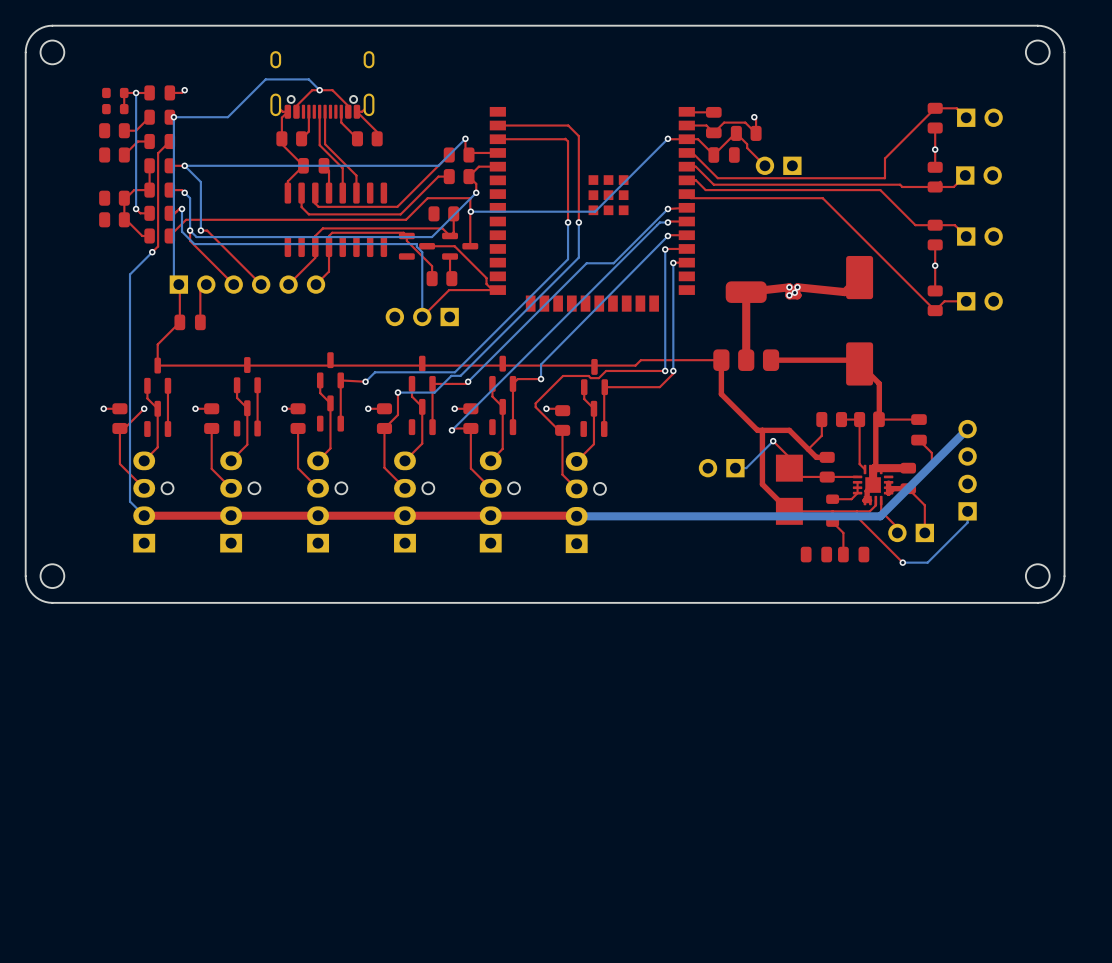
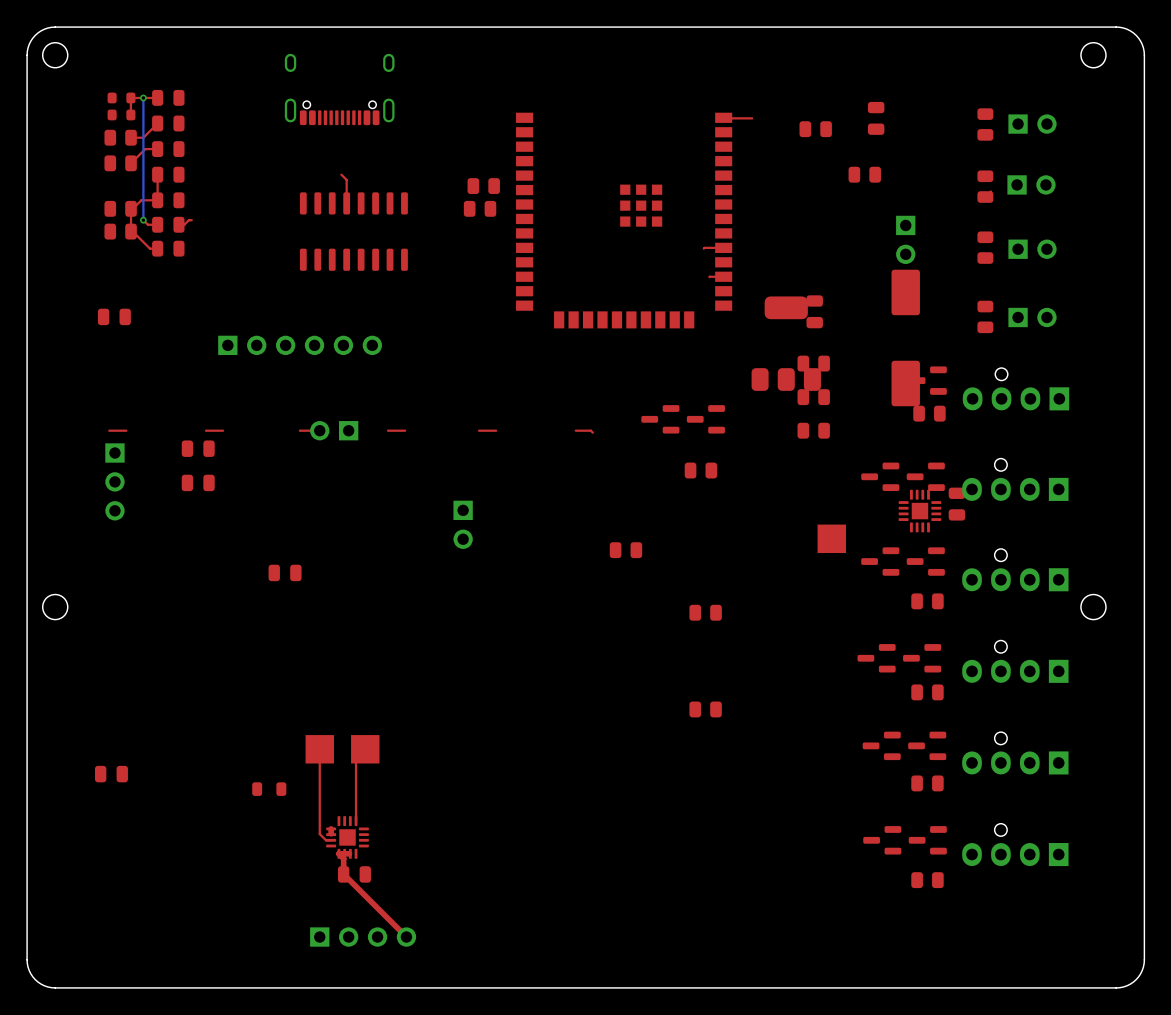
board edge: (1037, 25) (1048, 27) (1056, 33) (1062, 42) (1064, 52) (1064, 576) (1060, 589) (1051, 599) (1037, 602) (52, 602) (42, 600) (33, 595) (27, 586) (25, 576) -> (1093, 27) (1119, 27) (1130, 30) (1140, 41) (1144, 55) (1144, 959) (1140, 973) (1130, 984) (1116, 987) (55, 987) (44, 985) (32, 976) (27, 959) (27, 607)
top track: (184, 90) (182, 92) (169, 92) -> none
via: (184, 90) -> none
bottom track: (319, 90) (308, 79) (265, 79) (227, 117) (173, 117) (173, 279) (178, 284) -> none
via: (319, 90) -> none
top track: (275, 104) (282, 111) (287, 111) (281, 117) (281, 144) (303, 165) (287, 181) (287, 193) -> none
top track: (369, 104) (362, 111) (356, 111) (377, 132) (377, 138) -> none
top track: (938, 105) (884, 158) (884, 178) (717, 178) (692, 152) (686, 152) -> none
top track: (935, 108) (956, 108) (966, 117) -> none
top track: (308, 111) (308, 131) (301, 138) -> none
top track: (319, 111) (319, 145) (342, 168) (342, 193) -> none
top track: (325, 111) (325, 144) (356, 175) (356, 193) -> none
top track: (341, 111) (341, 122) (357, 138) -> none
top track: (348, 111) (348, 106) (332, 90) (312, 90) (296, 106) (296, 111) -> none
part: none -> (876, 118)
via: (173, 117) -> none
top track: (754, 117) (756, 118) (756, 133) (745, 122) (724, 122) (713, 132) (706, 125) (686, 125) -> none
via: (754, 117) -> none
part: (713, 122) -> none
top track: (497, 125) (568, 125) (578, 136) (578, 222) -> none
top track: (935, 128) (935, 167) (939, 163) -> none
part position: (746, 133) -> (815, 129)
part: (291, 138) -> none
part: (367, 138) -> none
top track: (465, 138) (465, 151) (468, 155) (471, 152) (497, 152) -> none
bottom track: (465, 138) (438, 165) (184, 165) (200, 182) (200, 230) -> none
via: (465, 138) -> none
top track: (667, 138) (698, 139) (713, 155) (736, 133) (747, 144) (747, 148) (764, 165) -> none
bottom track: (667, 138) (595, 211) (470, 211) -> none
via: (667, 138) -> none
top track: (497, 139) (565, 138) (568, 141) (568, 222) -> none
top track: (169, 141) (158, 153) (158, 246) (152, 252) -> none
via: (935, 149) -> none
top track: (449, 155) (397, 206) (318, 206) (315, 203) (315, 193) -> none
part: (459, 155) -> none
part: (724, 155) -> none
top track: (184, 165) (169, 165) -> none
via: (184, 165) -> none
part: (313, 165) -> none
part rotation: 0° (778, 165) -> 90° counterclockwise (905, 239)
part position: (778, 165) -> (905, 239)
part: none -> (864, 174)
top track: (497, 166) (478, 166) (468, 176) (476, 183) (476, 192) -> none
top track: (686, 166) (695, 166) (713, 184) (900, 184) (902, 186) (953, 186) (965, 175) (957, 167) -> none
top track: (449, 176) (438, 176) (400, 214) (308, 214) (301, 207) (301, 193) -> none
top track: (686, 180) (696, 180) (705, 190) (880, 190) (915, 225) (954, 225) (966, 236) -> none
top track: (169, 190) (182, 190) (184, 192) -> none
via: (184, 192) -> none
bottom track: (476, 192) (431, 237) (196, 237) (190, 230) (190, 198) (184, 192) -> none
via: (476, 192) -> none
top track: (686, 194) (690, 198) (822, 198) (935, 310) (944, 301) (966, 301) -> none
top track: (686, 207) (667, 208) (669, 207) -> none
bottom track: (182, 208) (182, 231) (194, 244) (416, 244) (422, 252) (422, 316) -> none
via: (182, 208) -> none
bottom track: (667, 208) (613, 263) (586, 263) (468, 381) -> none
via: (667, 208) -> none
via: (470, 211) -> none
part position: (443, 213) -> (480, 208)
top track: (453, 213) (453, 232) (450, 235) (442, 228) (322, 228) (315, 235) (315, 257) (288, 284) -> none
top track: (686, 221) (667, 222) -> none
bottom track: (568, 222) (568, 259) (454, 372) (375, 372) (365, 381) -> none
via: (568, 222) -> none
bottom track: (578, 222) (578, 257) (460, 375) (451, 375) (434, 392) (397, 392) -> none
via: (578, 222) -> none
bottom track: (667, 222) (659, 222) (451, 430) -> none
via: (667, 222) -> none
top track: (190, 230) (190, 240) (233, 284) -> none
via: (190, 230) -> none
top track: (200, 230) (207, 230) (261, 284) -> none
via: (200, 230) -> none
top track: (169, 235) (186, 219) (406, 219) (427, 198) (470, 198) (470, 246) -> none
via: (667, 235) -> none
bottom track: (668, 236) (541, 364) (541, 379) -> none
top track: (935, 244) (935, 290) (937, 288) -> none
part: (416, 246) -> none
top track: (427, 246) (454, 246) (486, 278) (486, 284) (492, 290) -> none
part: (460, 246) -> none
top track: (686, 248) (665, 249) -> none
bottom track: (665, 249) (665, 370) -> none
via: (665, 249) -> none
bottom track: (152, 252) (130, 274) (130, 501) (144, 515) -> none
via: (152, 252) -> none
top track: (450, 256) (450, 276) (451, 278) -> none
bottom track: (673, 262) (673, 370) -> none
via: (673, 262) -> none
via: (935, 265) -> none
top track: (859, 277) (845, 292) (797, 287) (794, 292) -> none
top track: (432, 278) (432, 266) (406, 240) (406, 235) (403, 232) (332, 232) (329, 235) (329, 271) (316, 284) -> none
part: (441, 278) -> none
top track: (178, 284) (179, 322) (157, 344) (157, 365) (635, 365) (640, 360) (721, 360) (721, 394) (757, 430) (789, 430) (816, 457) (827, 457) -> none
top track: (206, 284) (200, 290) (200, 322) -> none
part position: (247, 284) -> (300, 345)
via: (789, 287) -> none
via: (797, 287) -> none
top track: (497, 290) (449, 290) (422, 316) -> none
top track: (794, 292) (797, 295) (789, 295) (789, 287) (746, 292) (746, 360) -> none
via: (794, 292) -> none
part: none -> (814, 311)
via: (789, 295) -> none
part: none -> (114, 316)
part: (422, 316) -> none
part: (190, 322) -> none
part: none -> (813, 363)
top track: (771, 360) (855, 360) (879, 383) (879, 419) (919, 419) -> none
part: none -> (927, 380)
part: none -> (1015, 389)
part: (330, 370) -> none
top track: (665, 370) (606, 370) (598, 378) (590, 378) (588, 375) (563, 375) (535, 403) (535, 407) (558, 430) (562, 430) (562, 474) (576, 488) -> none
via: (665, 370) -> none
top track: (673, 370) (673, 373) (659, 387) (604, 387) (604, 429) -> none
via: (673, 370) -> none
part: (422, 373) -> none
part: (502, 373) -> none
part: (157, 375) -> none
part: (247, 375) -> none
part: none -> (813, 397)
part: (594, 377) -> none
top track: (541, 379) (517, 379) (512, 383) (512, 427) -> none
via: (541, 379) -> none
top track: (320, 380) (320, 393) (330, 403) (330, 448) (318, 460) -> none
top track: (366, 380) (340, 380) (340, 423) -> none
via: (365, 381) -> none
top track: (468, 381) (466, 383) (432, 383) (432, 427) -> none
via: (468, 381) -> none
top track: (412, 383) (412, 396) (422, 406) (422, 443) (404, 460) -> none
top track: (492, 383) (492, 396) (502, 406) (502, 448) (490, 460) -> none
top track: (147, 385) (147, 398) (157, 408) (157, 447) (144, 460) -> none
top track: (167, 385) (167, 429) -> none
top track: (237, 385) (237, 397) (247, 408) (247, 444) (231, 460) -> none
top track: (257, 385) (257, 428) -> none
top track: (584, 387) (584, 399) (593, 408) (593, 444) (576, 461) -> none
top track: (397, 392) (397, 414) (384, 428) (384, 467) (404, 488) -> none
via: (397, 392) -> none
part: none -> (929, 413)
part: none -> (660, 419)
part: none -> (705, 419)
via: (103, 408) -> none
top track: (144, 408) (124, 428) (119, 428) (119, 464) (144, 488) -> none
via: (144, 408) -> none
via: (195, 408) -> none
via: (284, 408) -> none
part: none -> (334, 430)
via: (368, 408) -> none
via: (454, 408) -> none
via: (546, 408) -> none
part: none -> (813, 430)
part: (330, 413) -> none
top track: (875, 414) (875, 469) -> none
part: (422, 417) -> none
part: (502, 417) -> none
part: (119, 418) -> none
part: (157, 418) -> none
part: (211, 418) -> none
part: (247, 418) -> none
part: (298, 418) -> none
part: (384, 418) -> none
part: (470, 418) -> none
part: (593, 418) -> none
top track: (821, 419) (821, 435) (808, 449) -> none
part: (831, 419) -> none
top track: (841, 419) (859, 419) (859, 464) (865, 469) -> none
part: (869, 419) -> none
part: (562, 420) -> none
part: none -> (198, 448)
top track: (211, 428) (211, 468) (231, 488) -> none
top track: (298, 428) (298, 468) (318, 488) -> none
part: (919, 429) -> none
bottom track: (967, 429) (880, 516) (576, 516) -> none
top track: (451, 430) (453, 428) (470, 428) (470, 468) (490, 488) -> none
via: (451, 430) -> none
top track: (762, 430) (762, 484) (789, 511) (869, 511) (875, 505) (875, 500) -> none
top track: (919, 440) (931, 452) (931, 464) -> none
top track: (773, 441) (789, 457) (789, 468) (798, 476) (857, 476) -> none
bottom track: (773, 441) (746, 468) (735, 468) -> none
via: (773, 441) -> none
part: none -> (700, 470)
part: none -> (880, 476)
part: none -> (925, 476)
part: none -> (1015, 479)
part: none -> (114, 481)
part: none -> (198, 482)
part: (827, 467) -> none
part: (721, 468) -> none
part: (789, 468) -> none
top track: (908, 468) (874, 468) (873, 485) (867, 490) (867, 498) (865, 500) (869, 500) -> none
part: (967, 470) -> none
top track: (857, 482) (857, 493) (851, 499) (832, 499) -> none
top track: (888, 483) (888, 493) (893, 488) (908, 488) (924, 505) (924, 532) -> none
part: none -> (463, 524)
top track: (881, 500) (881, 511) (897, 527) (897, 532) -> none
part: (153, 502) -> none
part: (240, 502) -> none
part: (327, 502) -> none
part: (414, 502) -> none
part: (499, 502) -> none
part: (585, 502) -> none
part: (832, 510) -> none
top track: (832, 511) (832, 522) (843, 532) (843, 554) -> none
top track: (856, 511) (856, 516) (902, 562) -> none
bottom track: (967, 511) (967, 522) (927, 562) (902, 562) -> none
top track: (144, 515) (576, 516) -> none
part: none -> (625, 550)
part: none -> (880, 561)
part: none -> (925, 561)
part: (911, 532) -> none
part: none -> (1015, 570)
part: none -> (285, 572)
part: (816, 554) -> none
part: (853, 554) -> none
via: (902, 562) -> none
part: none -> (927, 601)
part: none -> (705, 612)
part: none -> (876, 658)
part: none -> (922, 658)
part: none -> (1015, 661)
part: none -> (927, 692)
part: none -> (705, 709)
part: none -> (881, 745)
part: none -> (927, 745)
top track: none -> (319, 749) (319, 834) (326, 840) (331, 840)
part: none -> (319, 749)
top track: none -> (365, 749) (356, 758) (356, 821)
part: none -> (365, 749)
part: none -> (1015, 753)
part: none -> (111, 774)
part: none -> (927, 783)
part: none -> (269, 789)
top track: none -> (331, 828) (331, 833)
part: none -> (347, 837)
part: none -> (882, 840)
part: none -> (927, 840)
part: none -> (1015, 844)
top track: none -> (349, 853) (338, 853) (343, 858) (343, 874) (406, 937)
part: none -> (354, 874)
part: none -> (927, 880)
part: none -> (363, 937)

